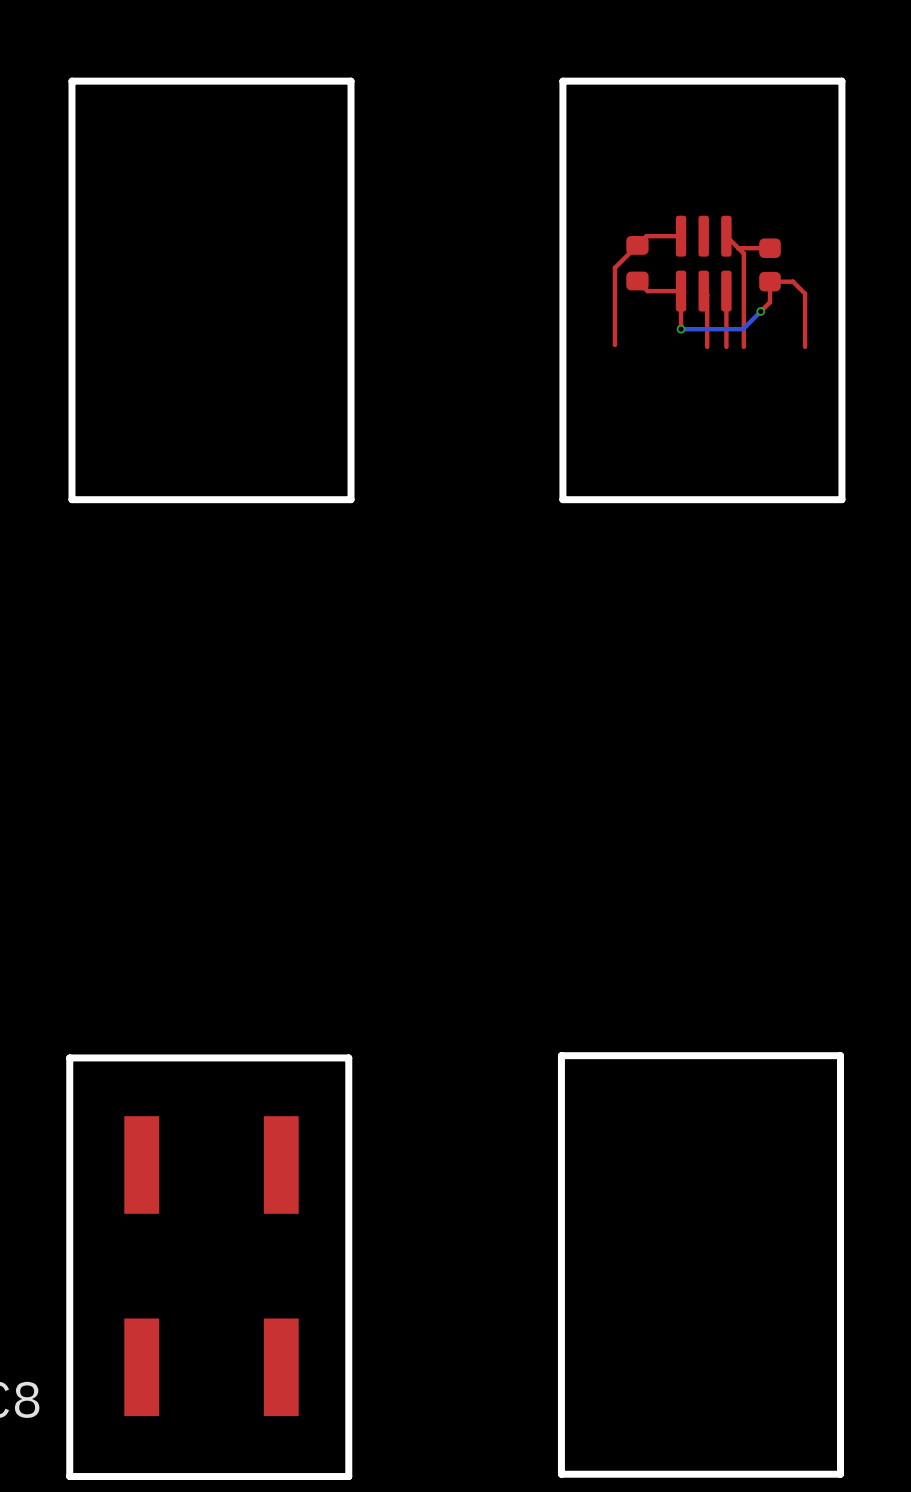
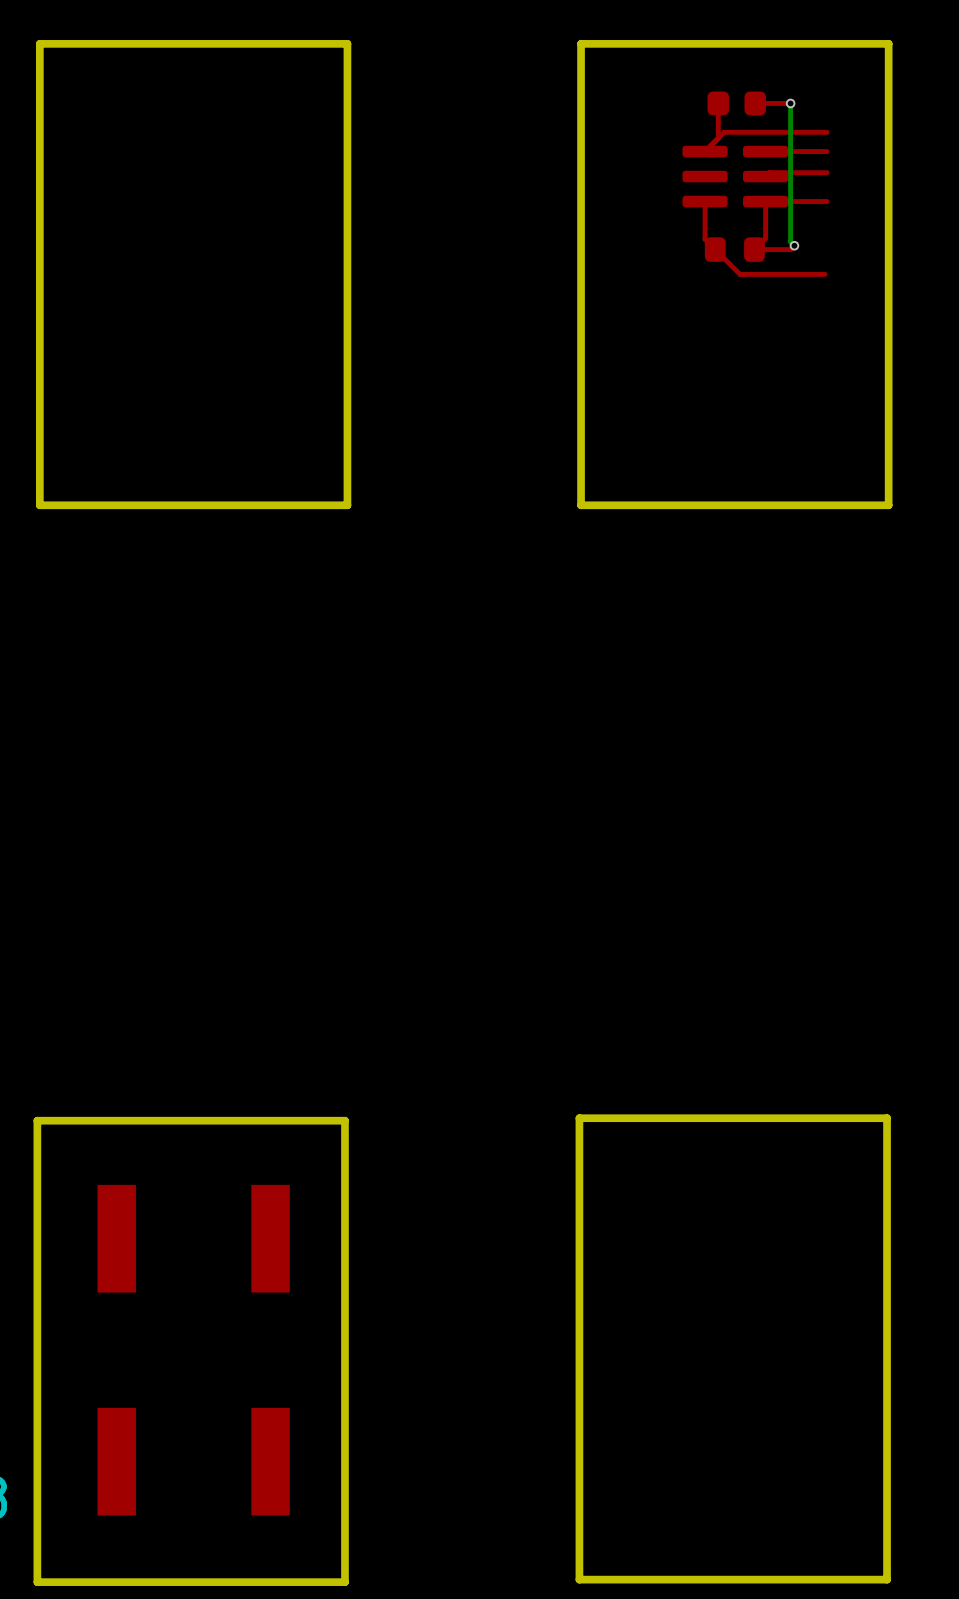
top track: none -> (718, 103) (718, 138)
bottom track: none -> (790, 103) (790, 241) (794, 245)
via: none -> (790, 103)
top track: none -> (827, 132) (724, 132) (705, 151)
top track: none -> (827, 151) (765, 151)
top track: none -> (827, 172) (769, 172) (765, 176)
part: none -> (735, 176)
part footprint: [675, 215, 732, 312] -> [704, 237, 765, 262]
top track: none -> (705, 201) (705, 239) (740, 274) (825, 274)
top track: none -> (827, 201) (765, 201) (765, 238) (754, 249) (790, 249) (794, 245)
top track: (681, 236) (646, 236) (614, 267) (614, 345) -> none
top track: (726, 236) (743, 253) (743, 346) -> none
top track: (769, 248) (738, 248) -> (790, 103) (755, 103)
part: (637, 263) -> none
part rotation: 0° (769, 264) -> 90° clockwise (736, 103)
part position: (769, 264) -> (736, 103)
top track: (637, 280) (647, 291) (681, 291) (681, 329) -> none
top track: (703, 291) (707, 294) (707, 346) -> none
top track: (726, 291) (726, 346) -> none
top track: (760, 311) (769, 302) (769, 281) (793, 281) (805, 293) (805, 346) -> none
bottom track: (760, 311) (743, 329) (681, 329) -> none
via position: (760, 311) -> (794, 245)
via: (681, 329) -> none

